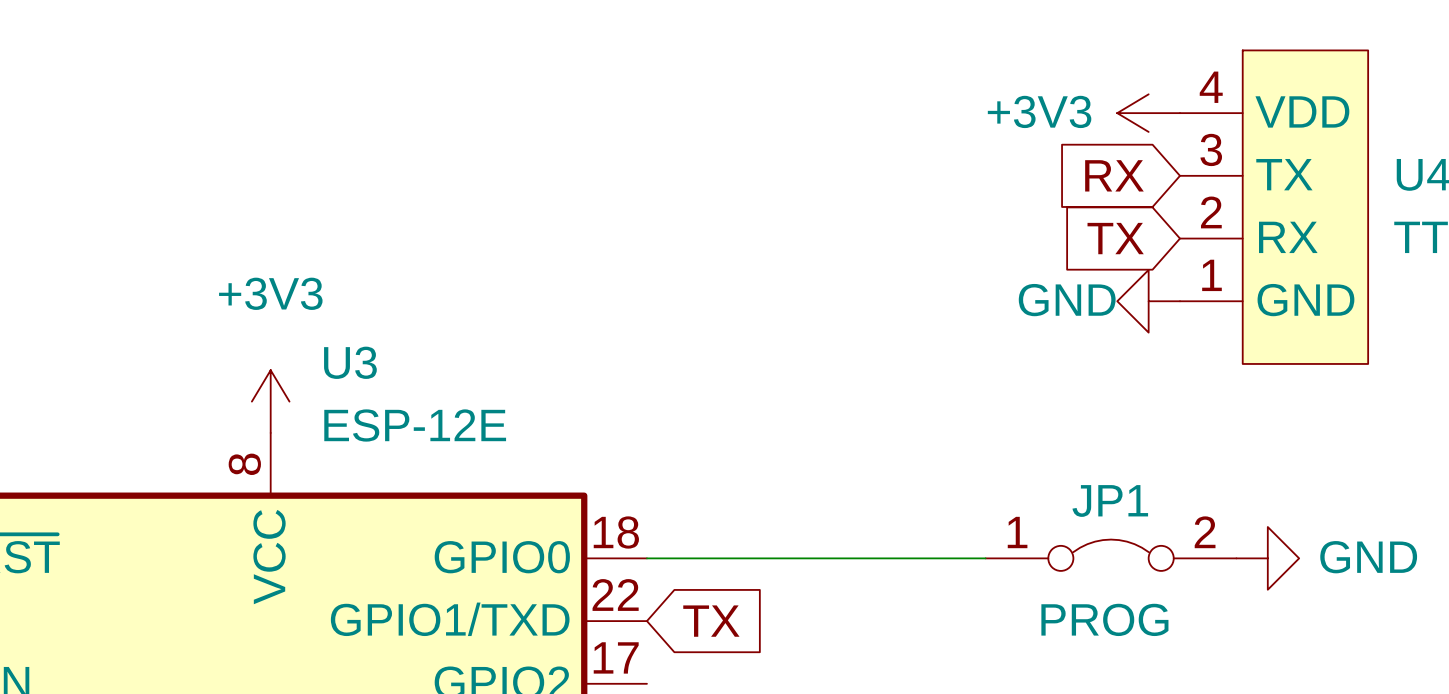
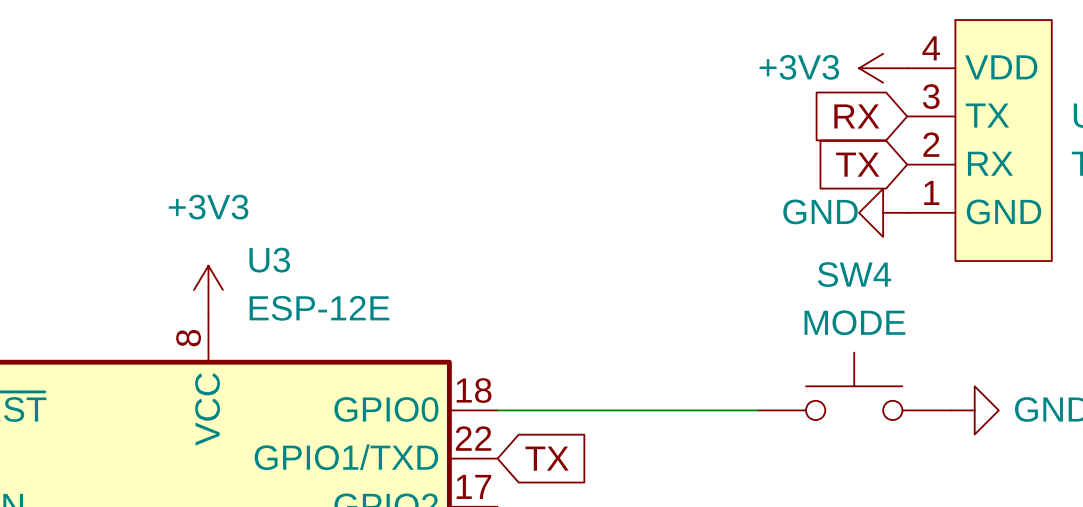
SW4: none -> MODE (854, 386)
JP1: PROG (1111, 555) -> none

